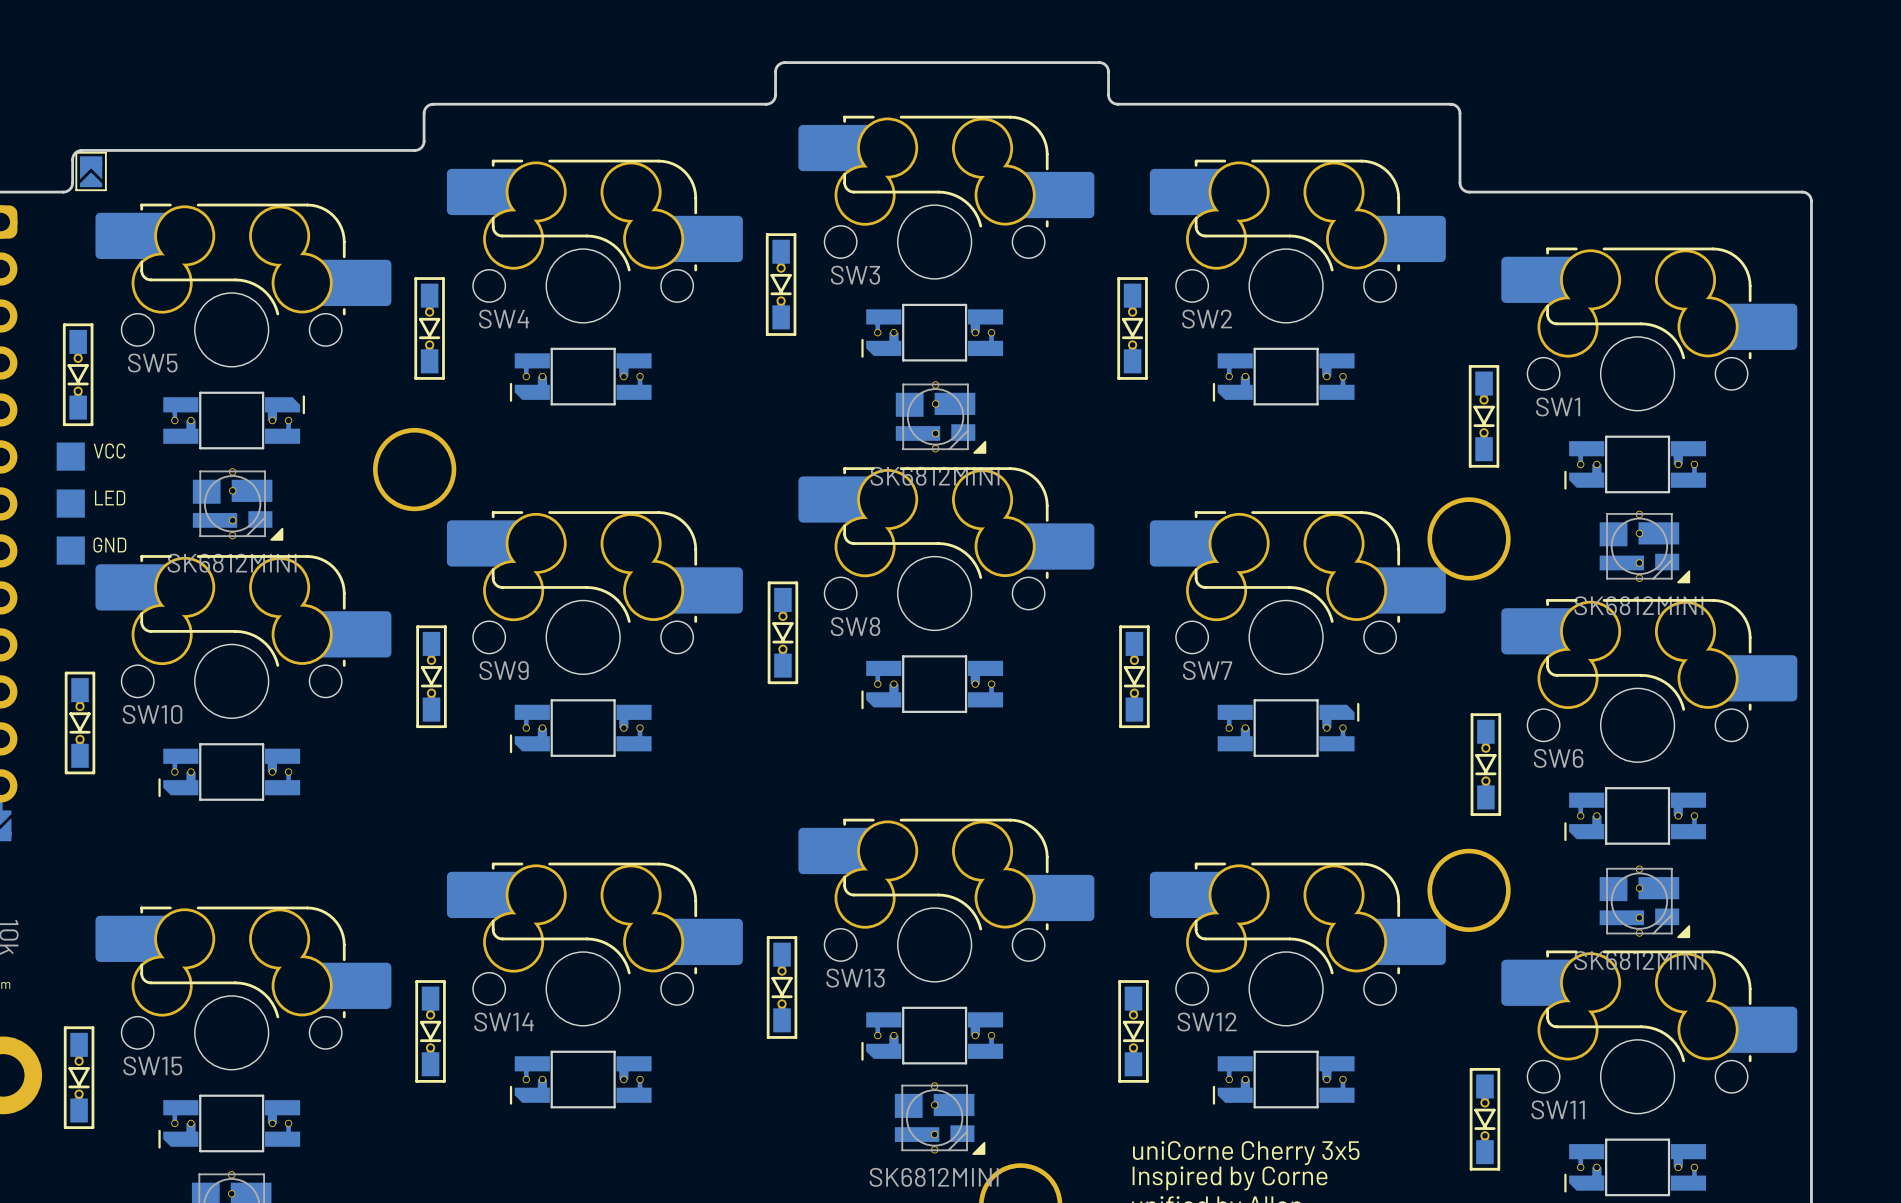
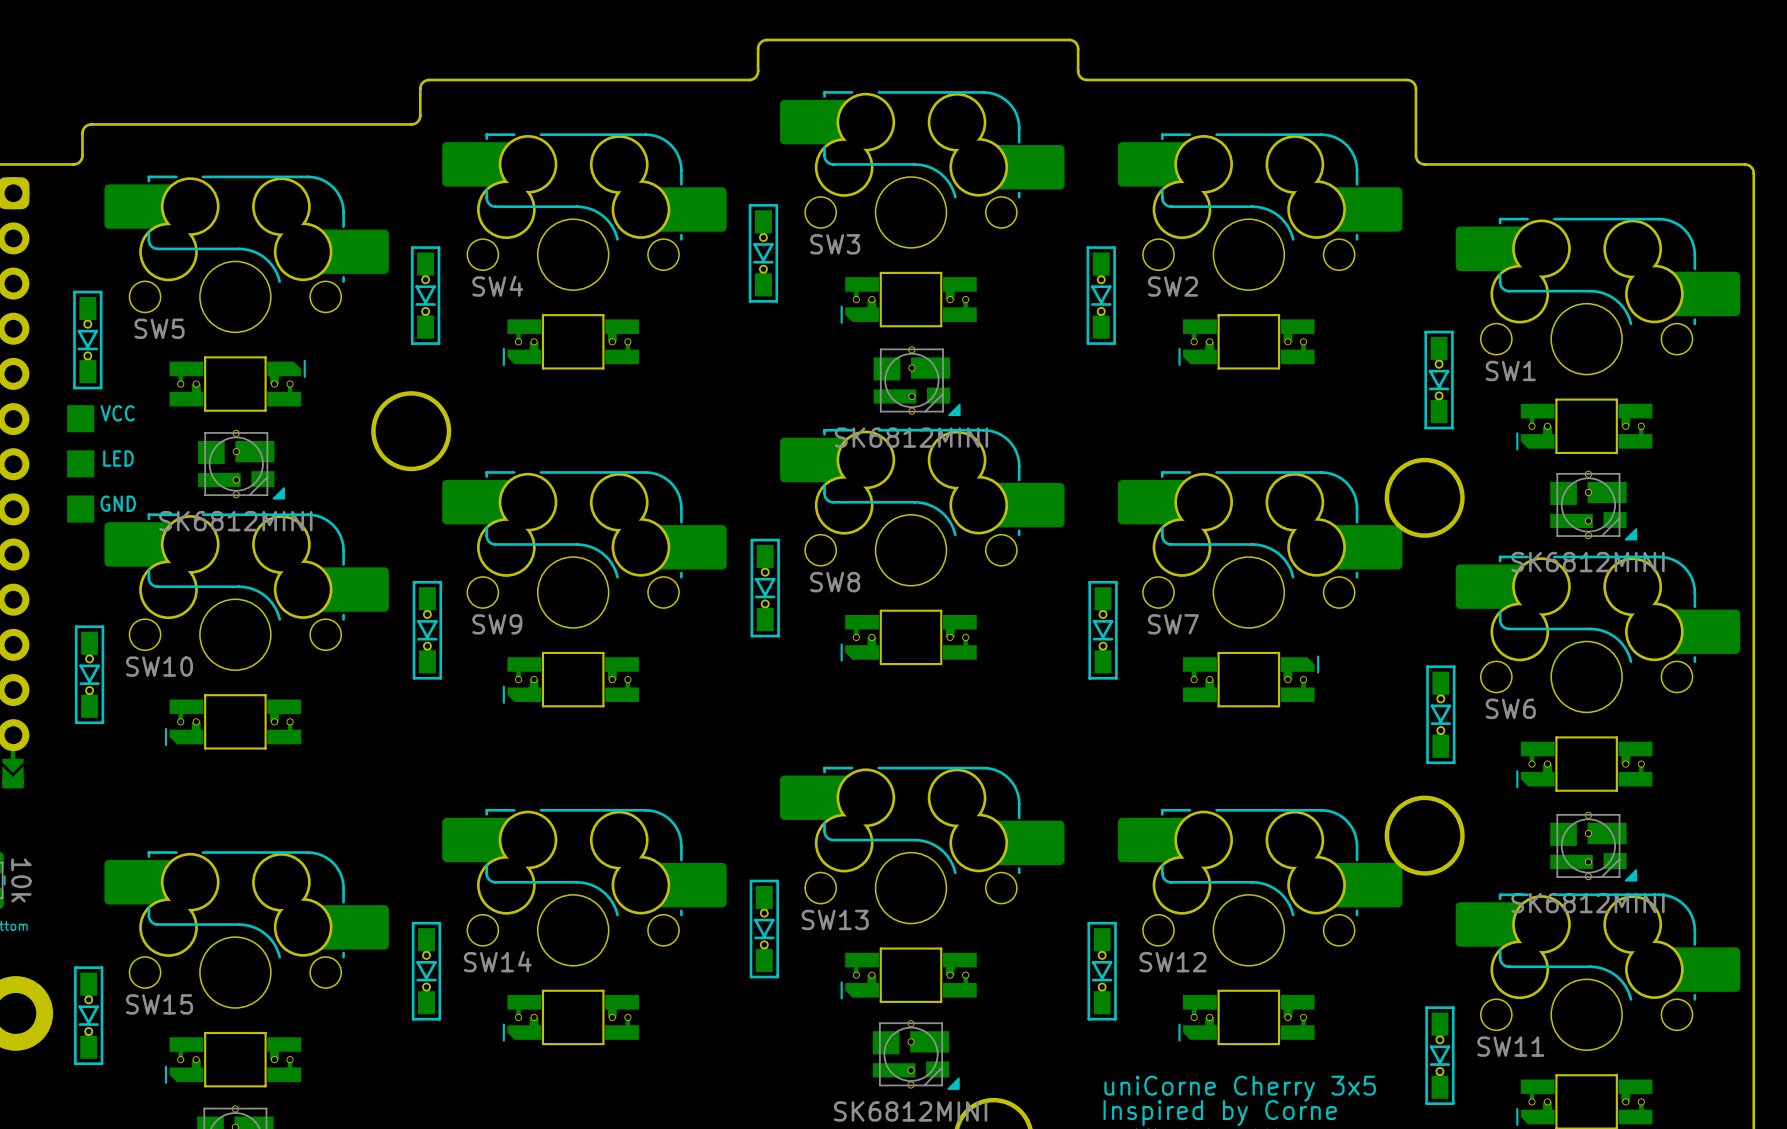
line: (105, 152) (76, 152) (76, 190) (105, 190) (105, 152) -> none
part: (91, 171) -> none

